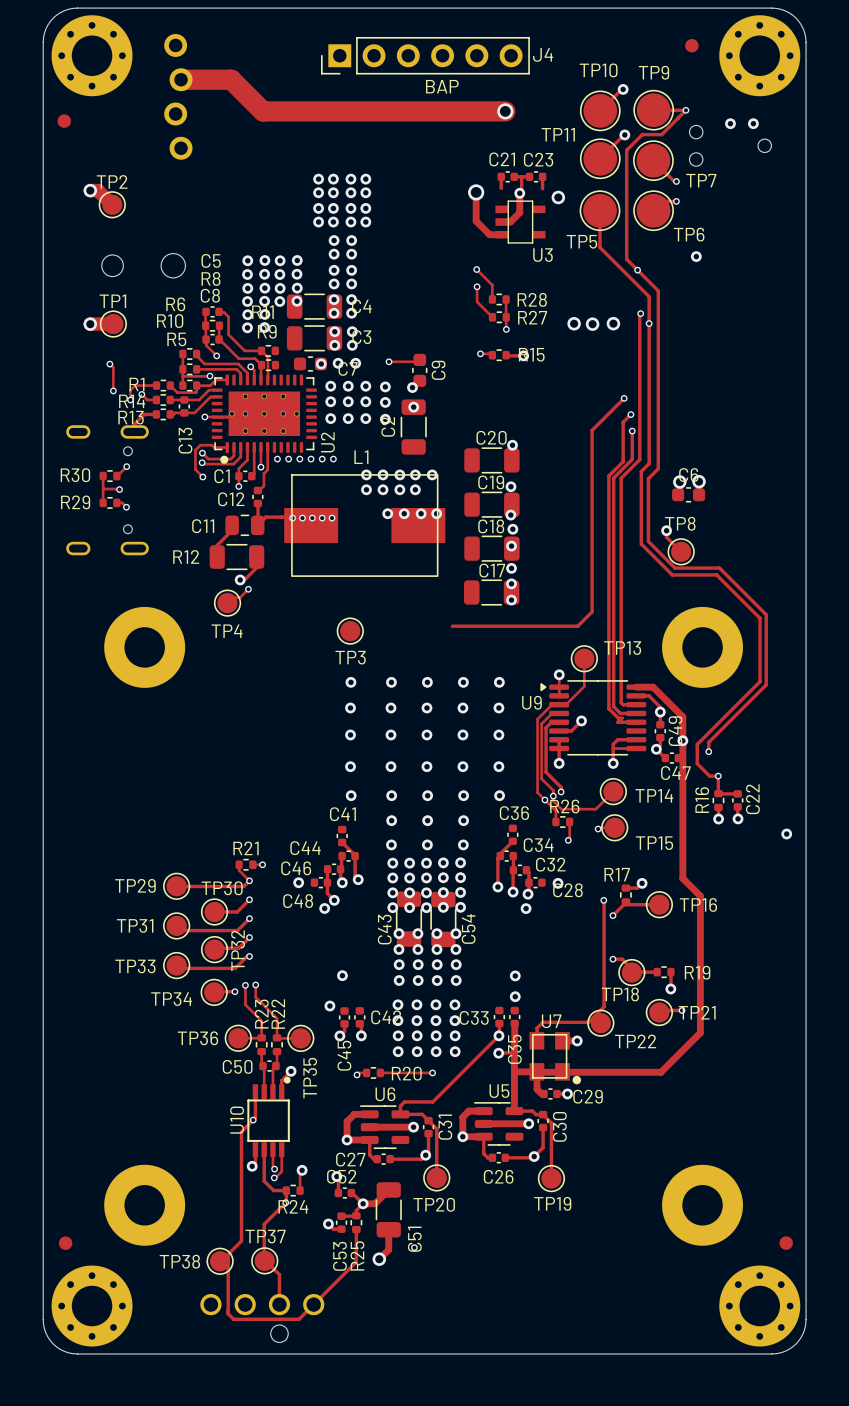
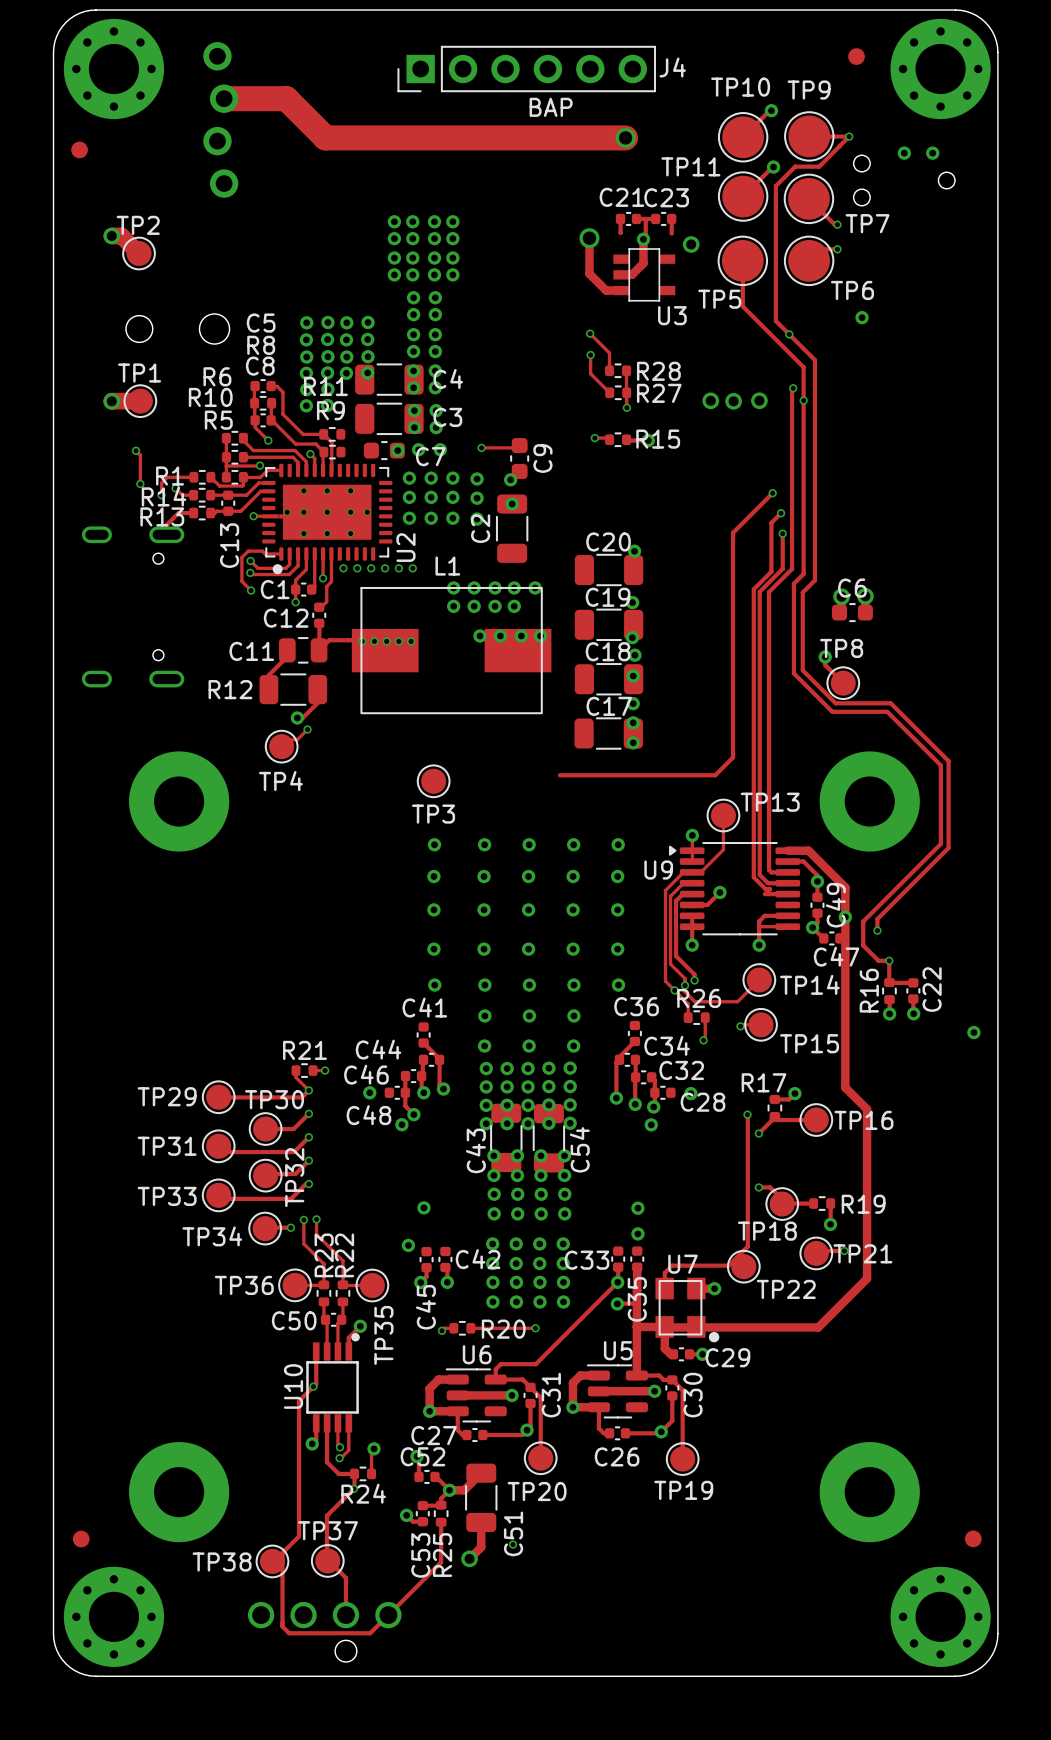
track: (126, 466) (116, 476) -> none
via: (126, 466) -> none
track: (103, 476) (103, 502) -> none
R30: (110, 476) -> none
track: (103, 489) (119, 489) -> none
via: (119, 489) -> none
R29: (110, 502) -> none
track: (116, 502) (122, 502) (126, 507) -> none
via: (126, 507) -> none

